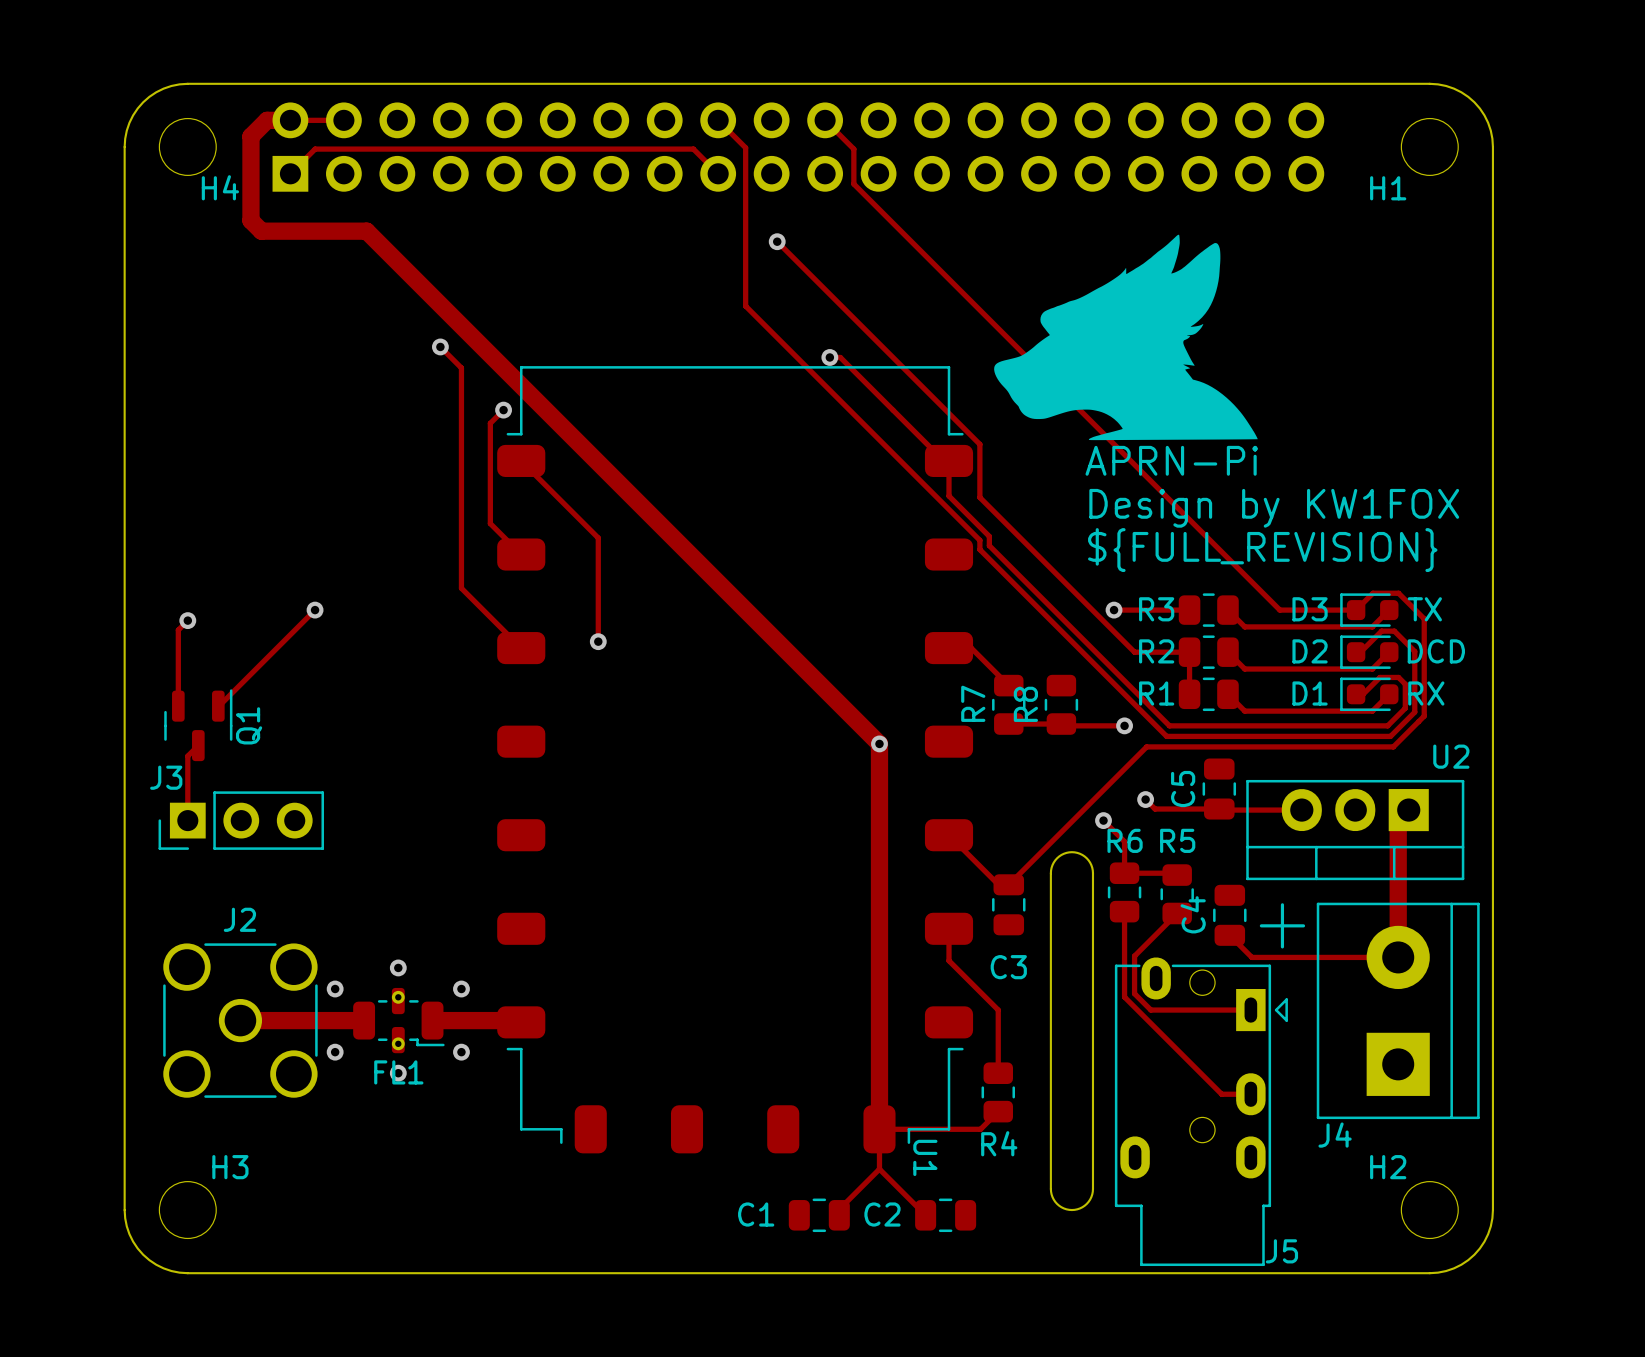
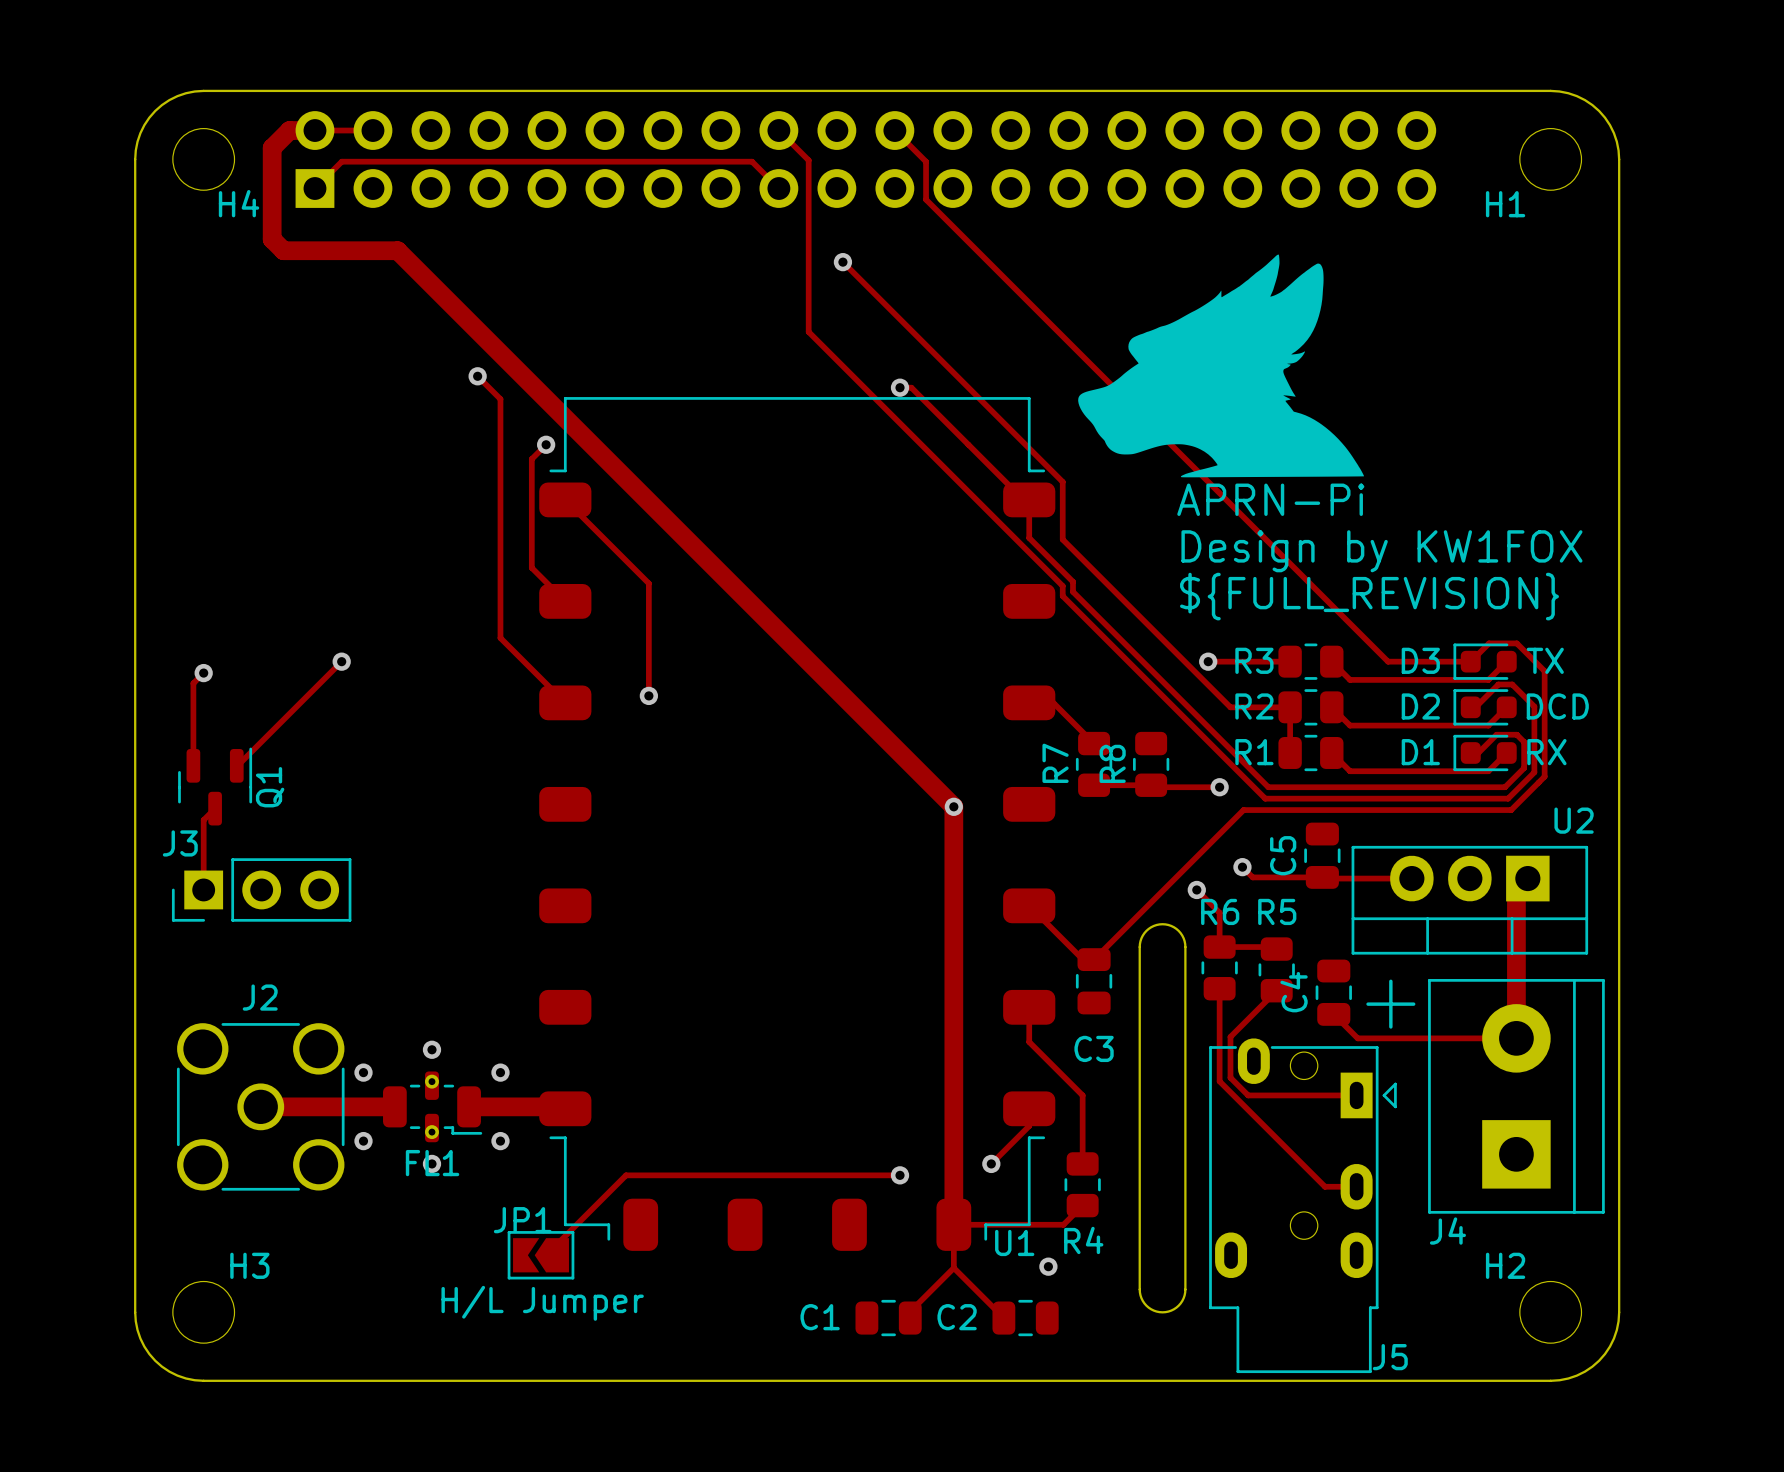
track: none -> (1029, 1108) (1029, 1126) (991, 1163)
via: none -> (991, 1163)
track: none -> (900, 1175) (626, 1175) (557, 1243) (557, 1255)
via: none -> (900, 1175)
JP1: none -> H/L Jumper (541, 1255)
U1 name rotation: 0° (925, 1157) -> 90° counterclockwise (1014, 1242)
via: none -> (1048, 1266)

